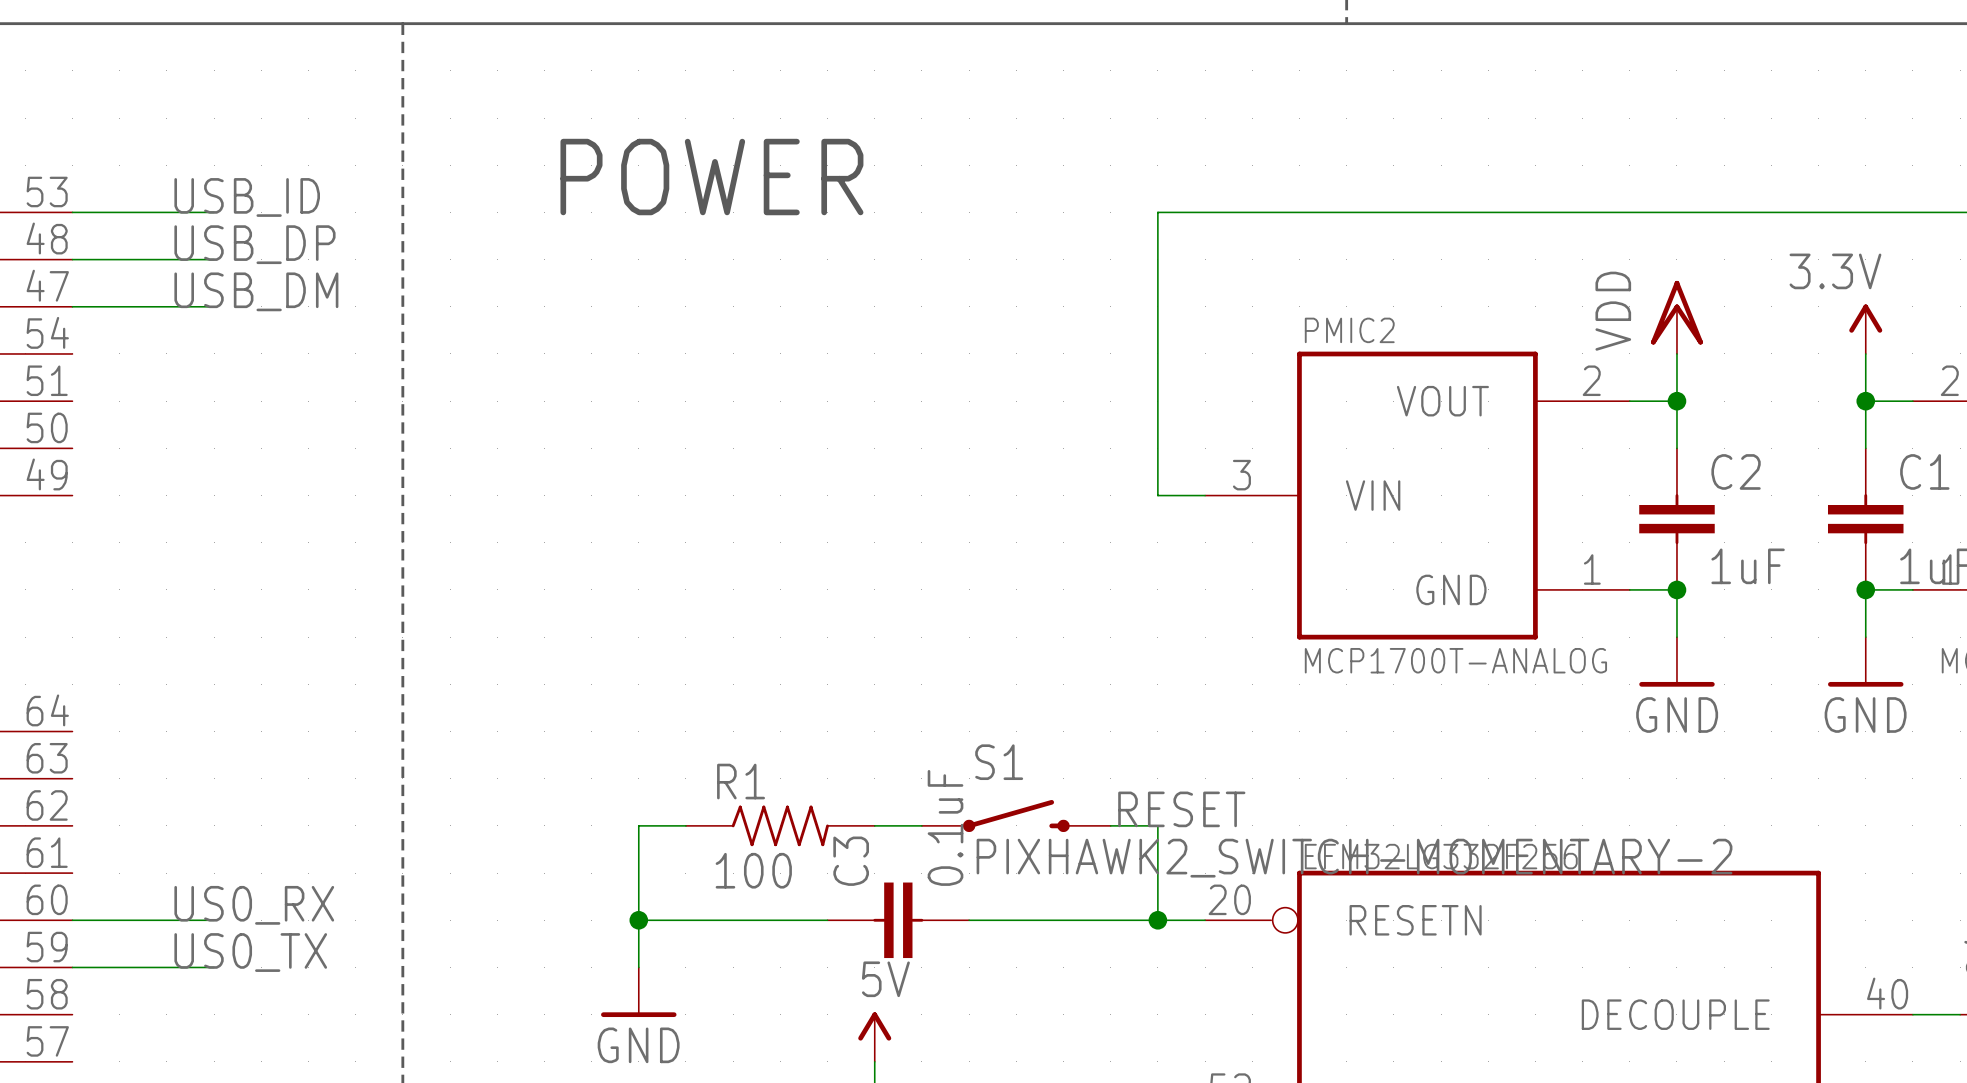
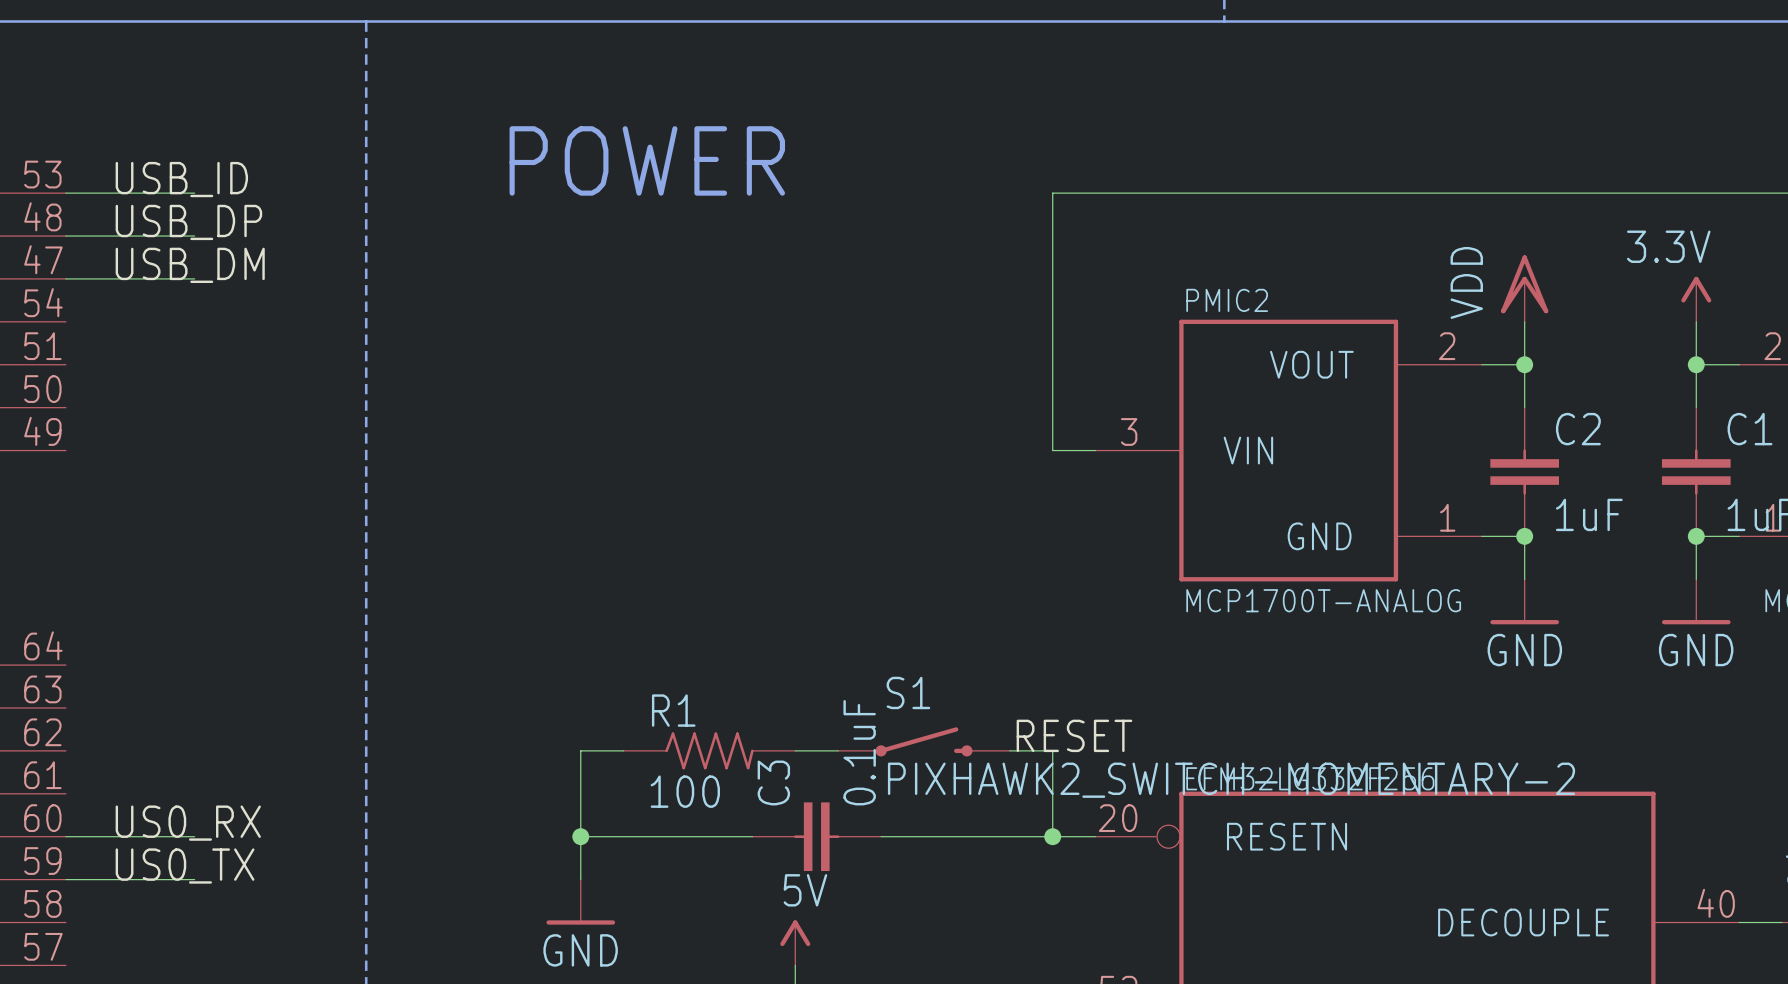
label position: USB_ID (247, 197) -> USB_ID (181, 179)
label position: USB_DP (254, 244) -> USB_DP (188, 222)
label position: USB_DM (256, 291) -> USB_DM (190, 265)
label position: US0_RX (254, 905) -> US0_RX (188, 823)
label position: US0_TX (250, 952) -> US0_TX (185, 866)

